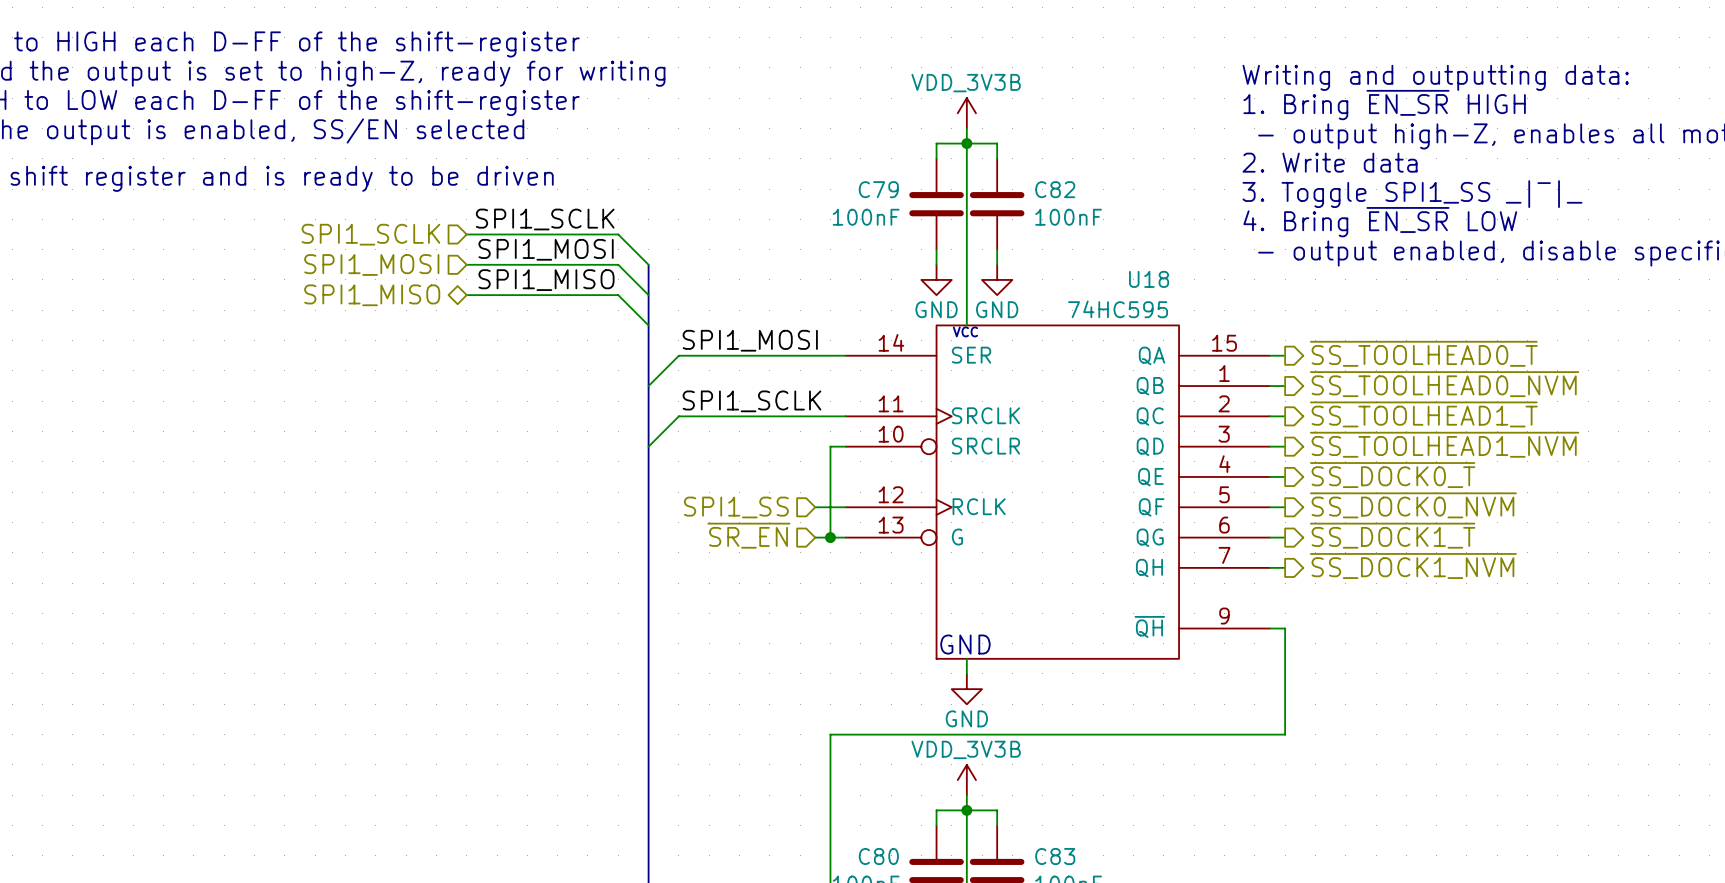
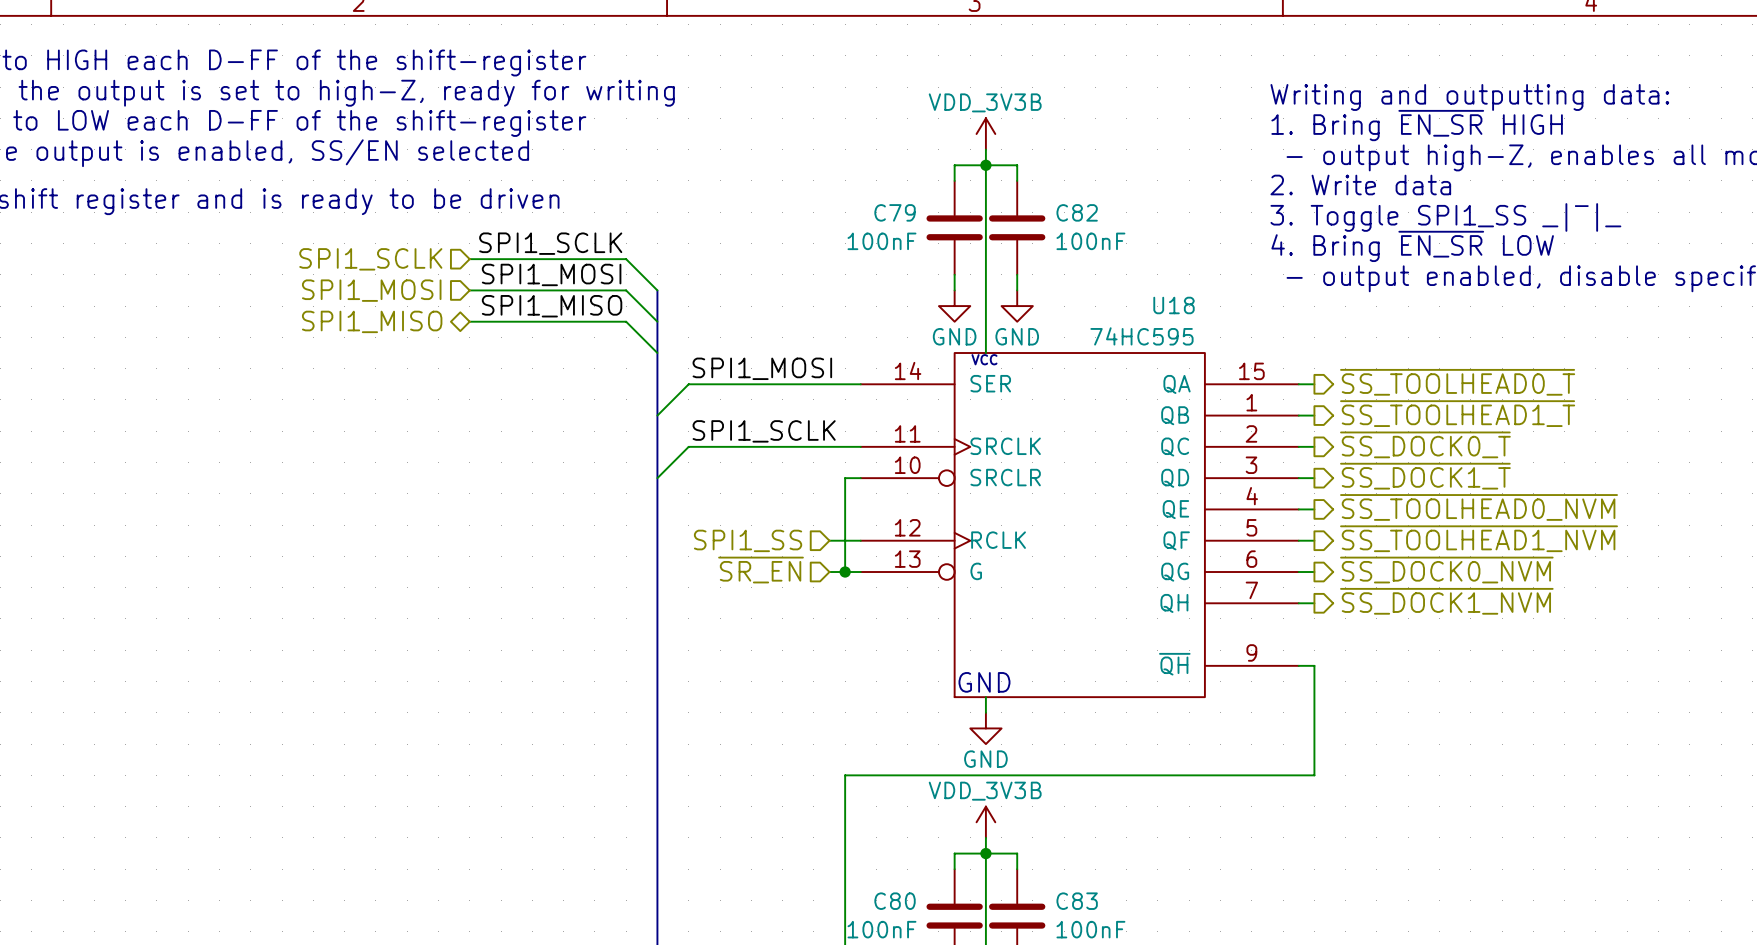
hierarchical label: ~{SS_TOOLHEAD0_NVM} (1444, 384) -> ~{SS_TOOLHEAD1_T} (1457, 413)
hierarchical label: ~{SS_TOOLHEAD1_T} (1423, 414) -> ~{SS_DOCK0_T} (1425, 444)
hierarchical label: ~{SS_TOOLHEAD1_NVM} (1444, 444) -> ~{SS_DOCK1_T} (1425, 476)
hierarchical label: ~{SS_DOCK0_T} (1392, 475) -> ~{SS_TOOLHEAD0_NVM} (1479, 507)
hierarchical label: ~{SS_DOCK0_NVM} (1413, 505) -> ~{SS_TOOLHEAD1_NVM} (1479, 538)
hierarchical label: ~{SS_DOCK1_T} (1392, 535) -> ~{SS_DOCK0_NVM} (1446, 570)

